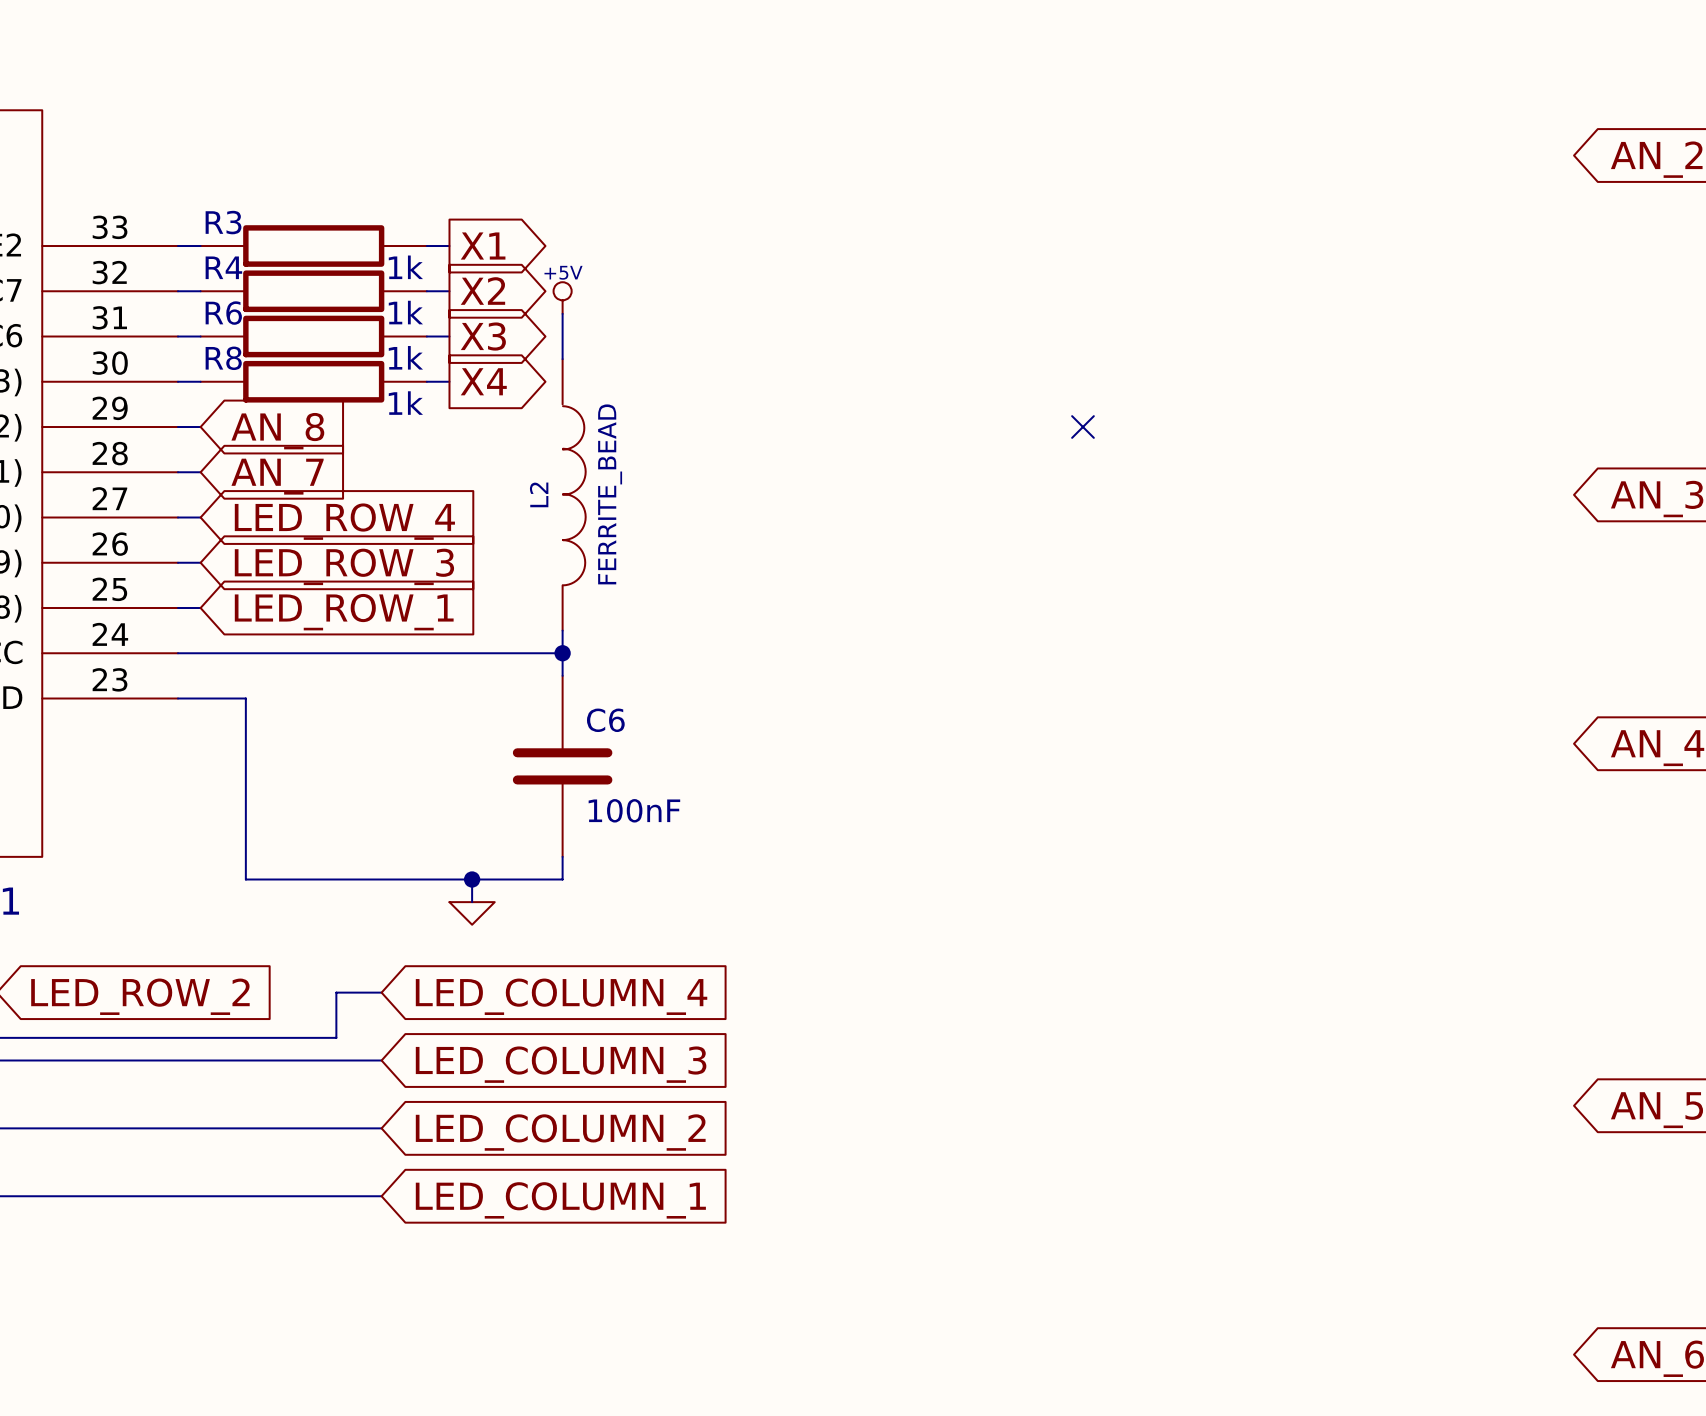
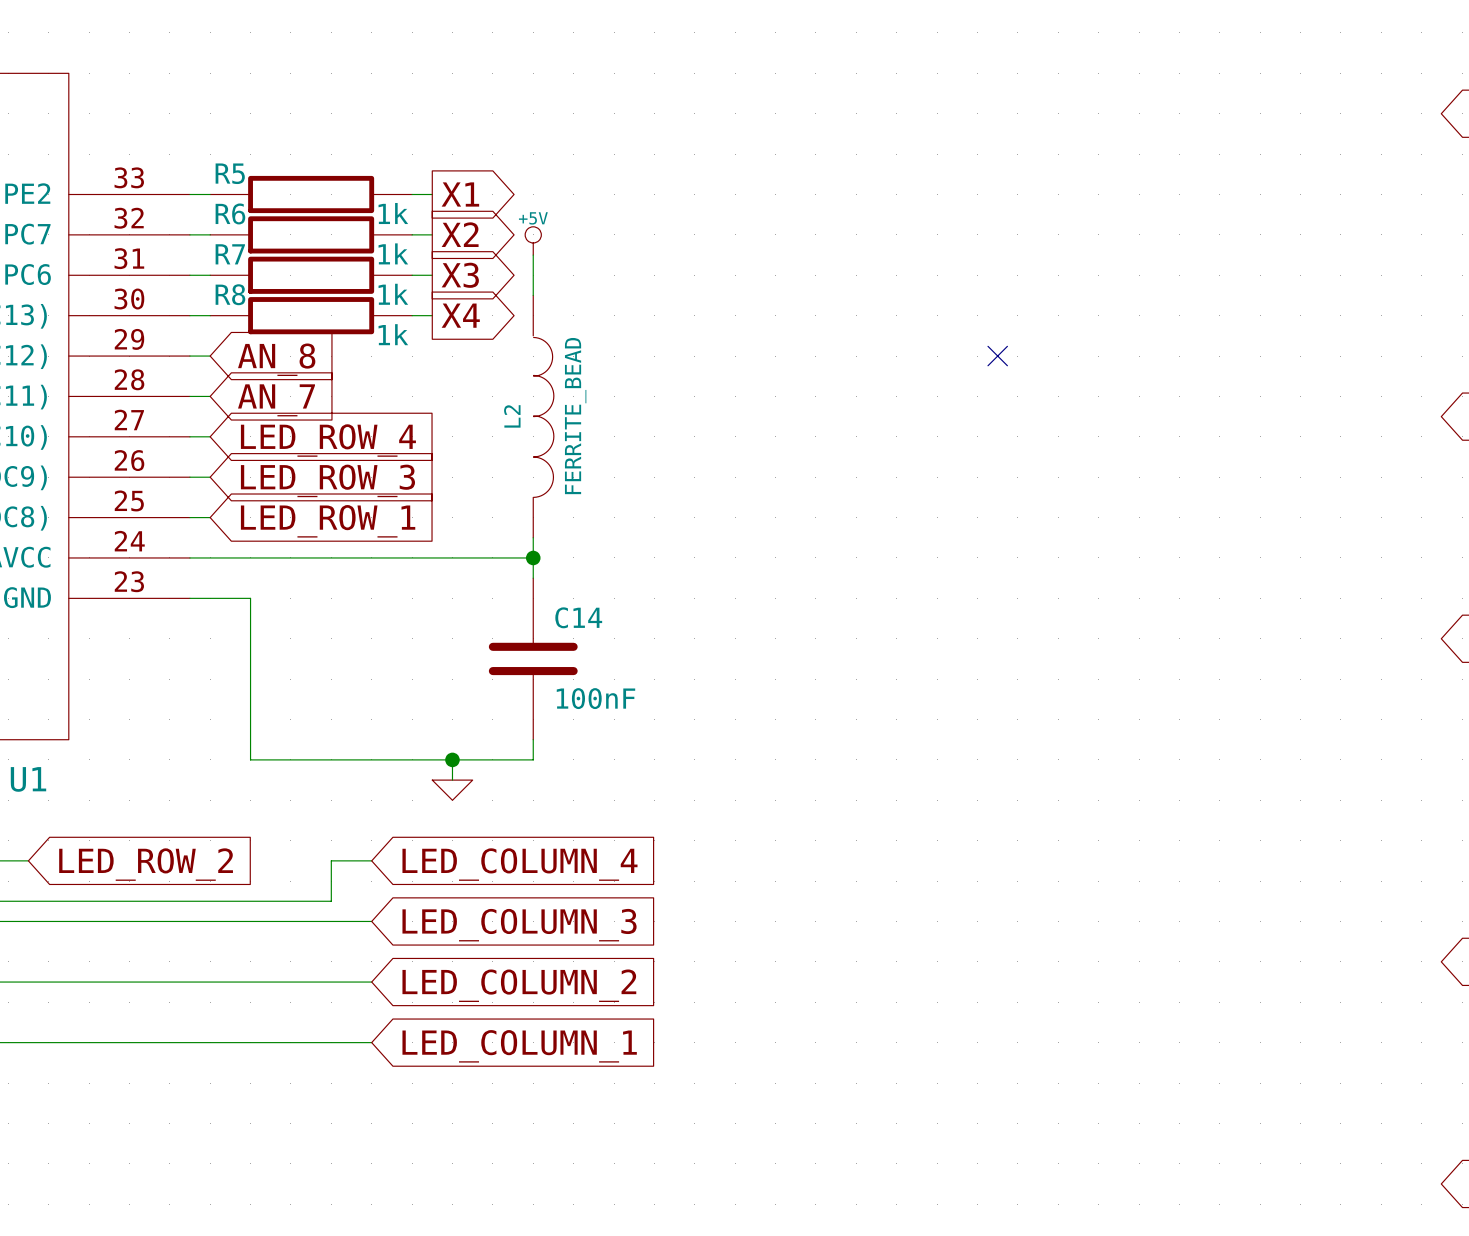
R3 name: R3 (223, 222) -> R5 (230, 173)
R4 name: R4 (223, 267) -> R6 (230, 213)
R6 name: R6 (223, 313) -> R7 (230, 254)
C6 name: C6 (605, 720) -> C14 (578, 617)

